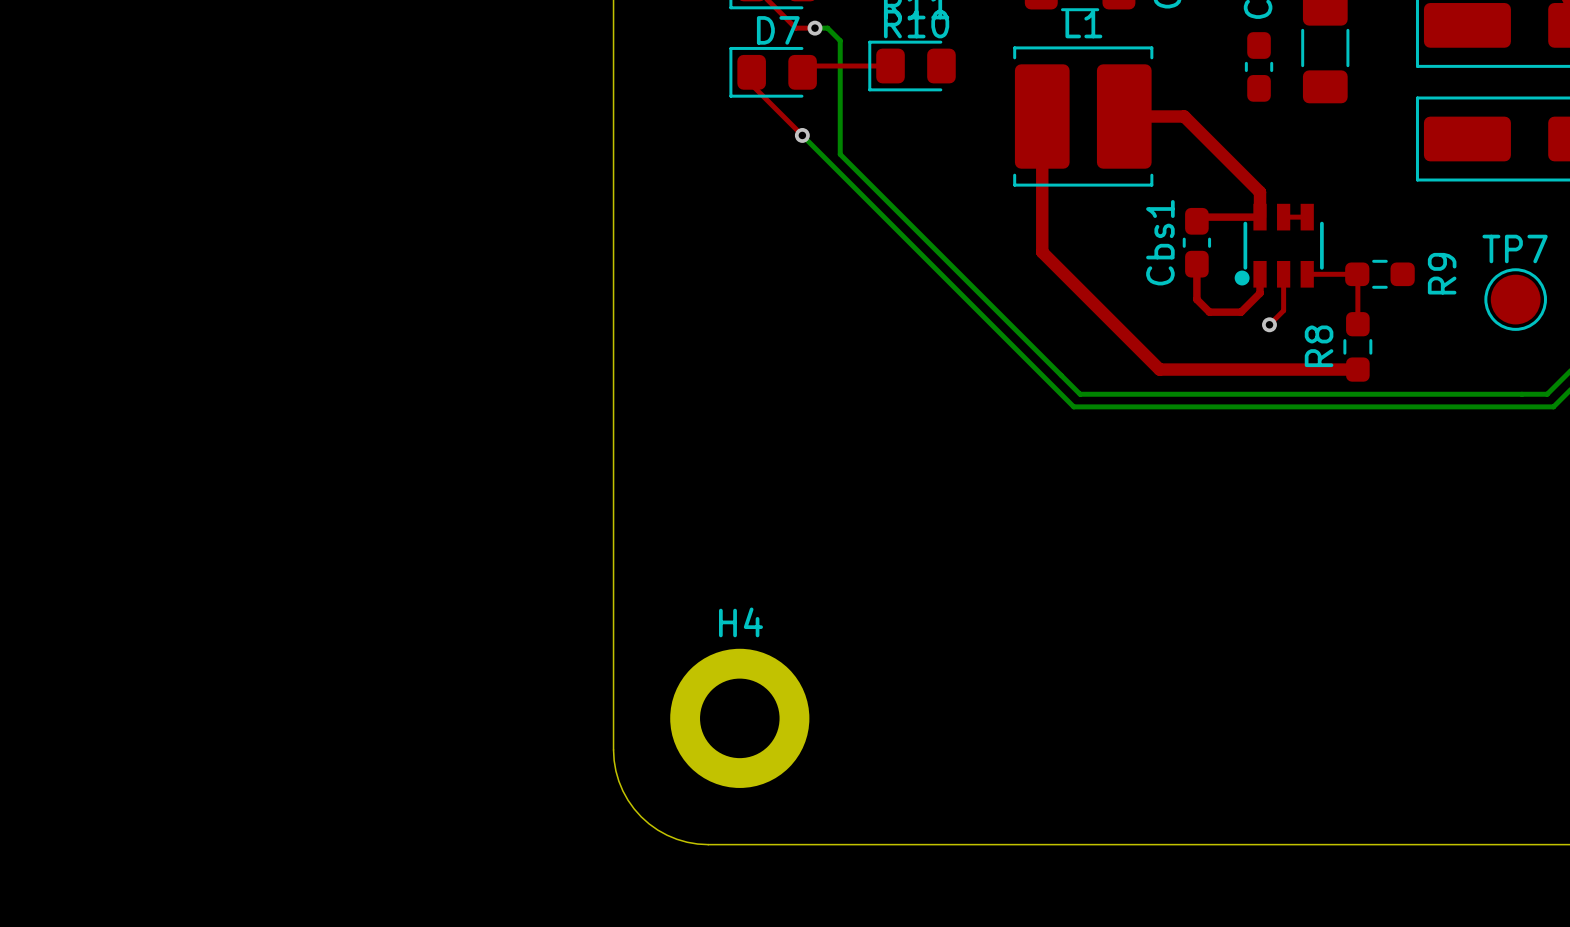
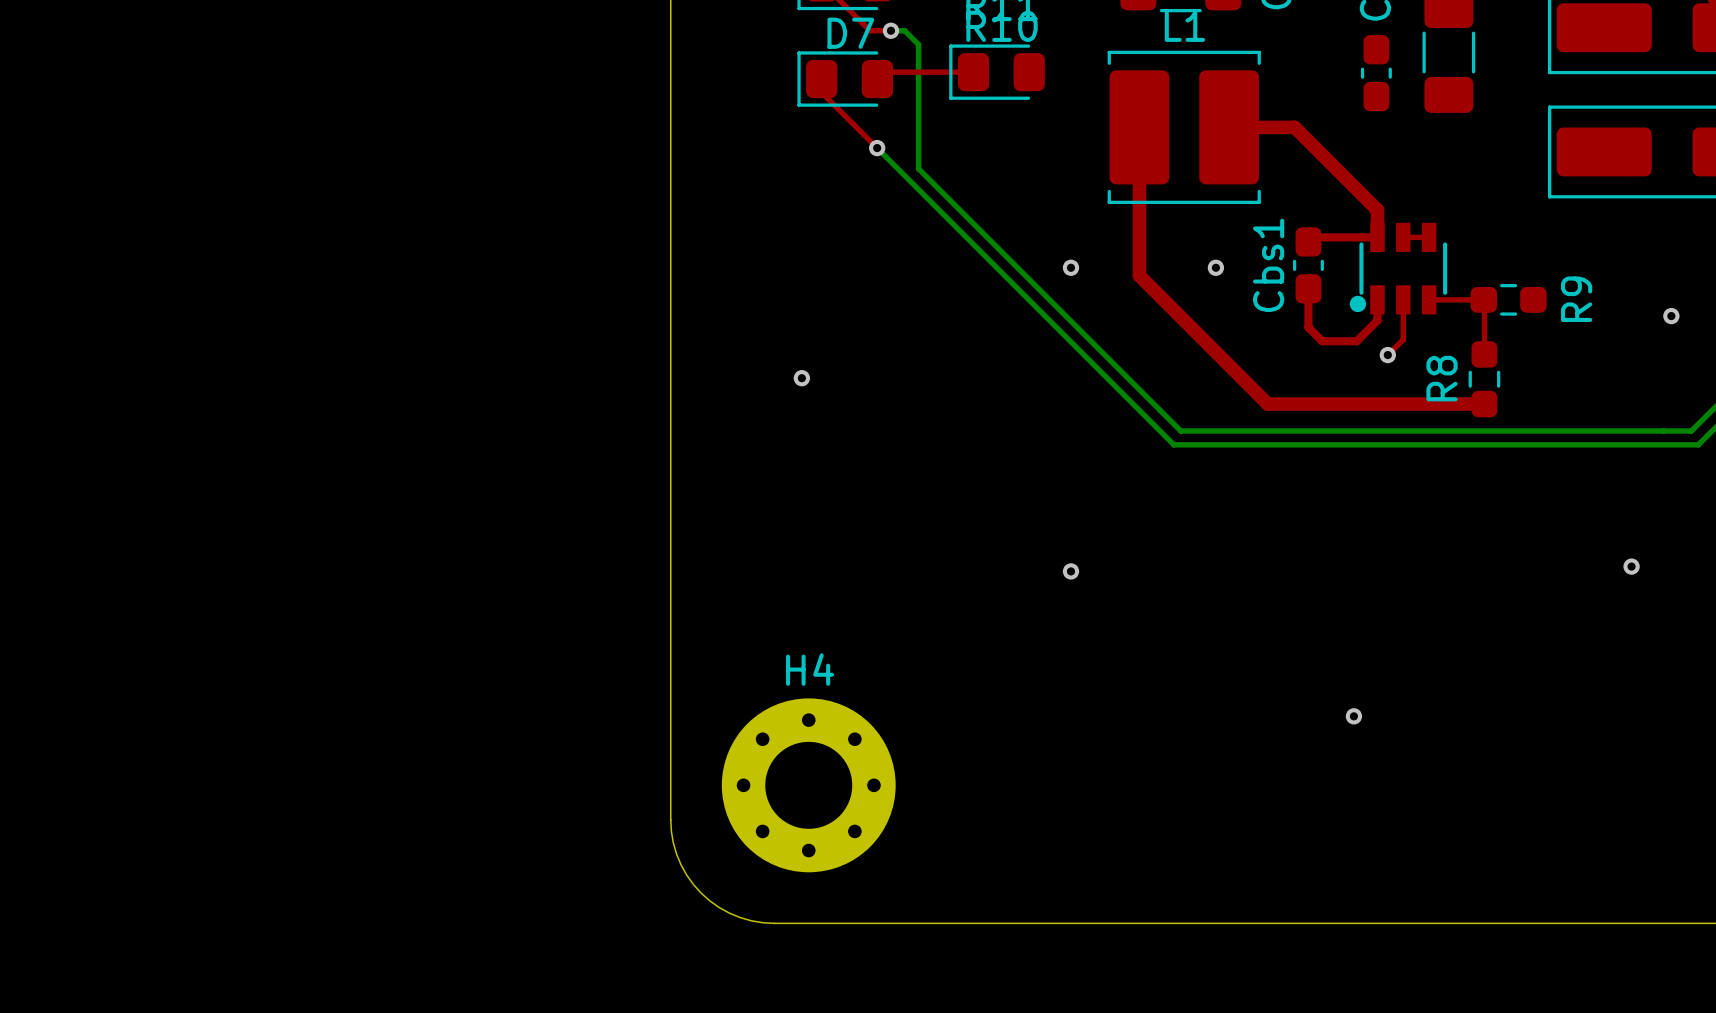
via: none -> (1070, 267)
via: none -> (1215, 267)
via: none -> (1671, 316)
TP7: (1515, 299) -> none
via: none -> (801, 378)
via: none -> (1631, 566)
via: none -> (1070, 571)
H4 footprint: [670, 648, 810, 788] -> [721, 698, 896, 873]
via: none -> (1353, 716)

